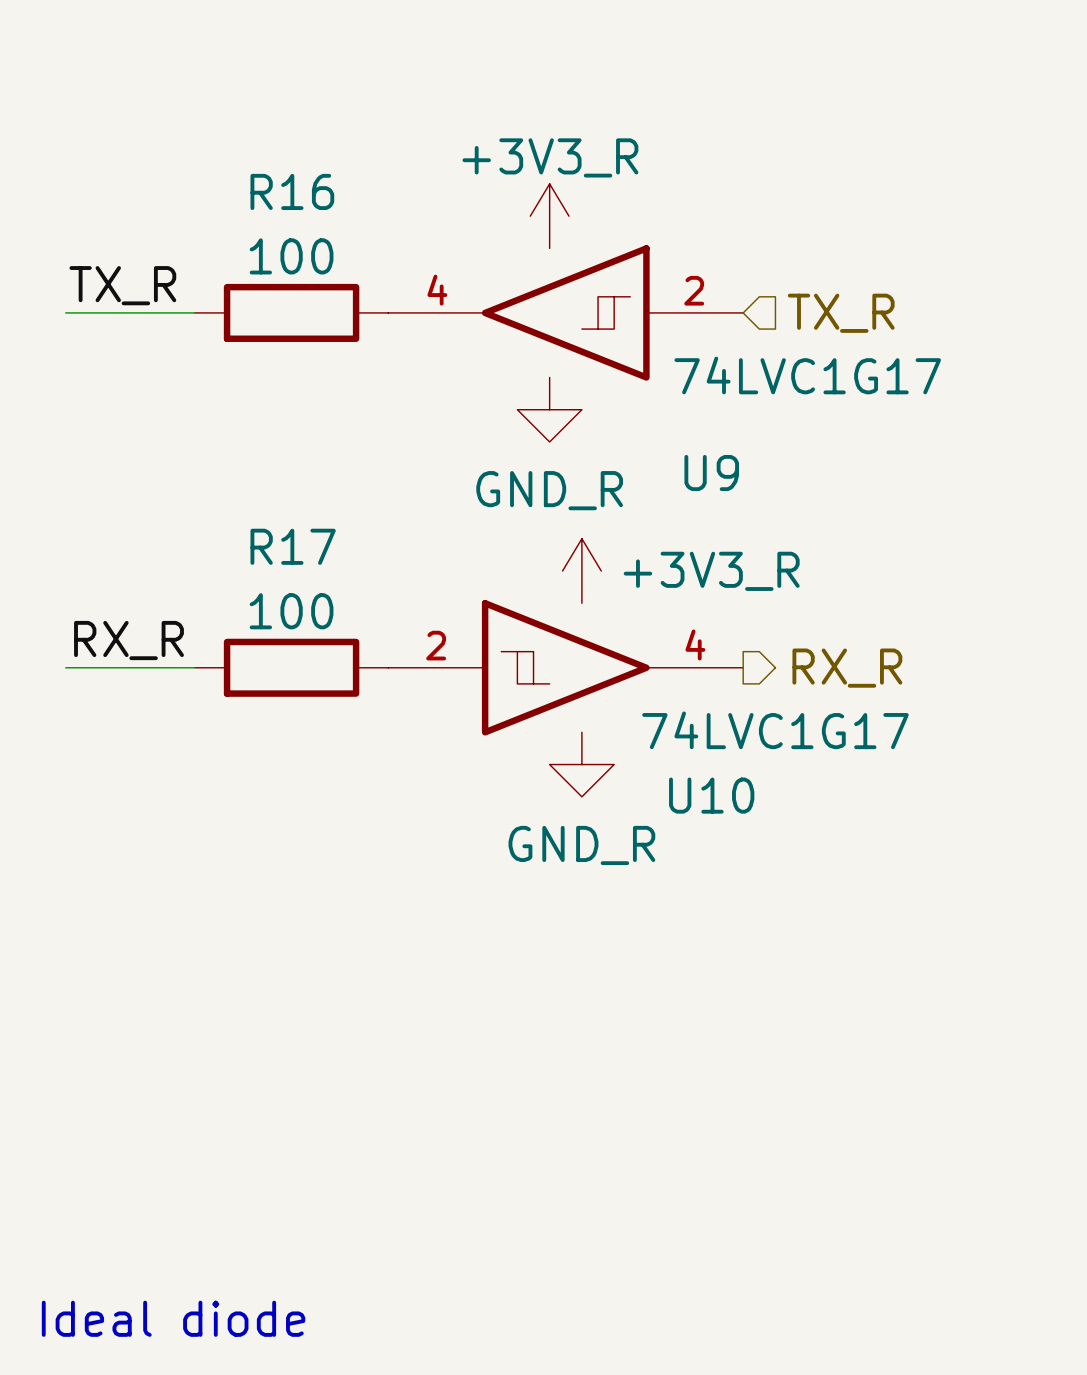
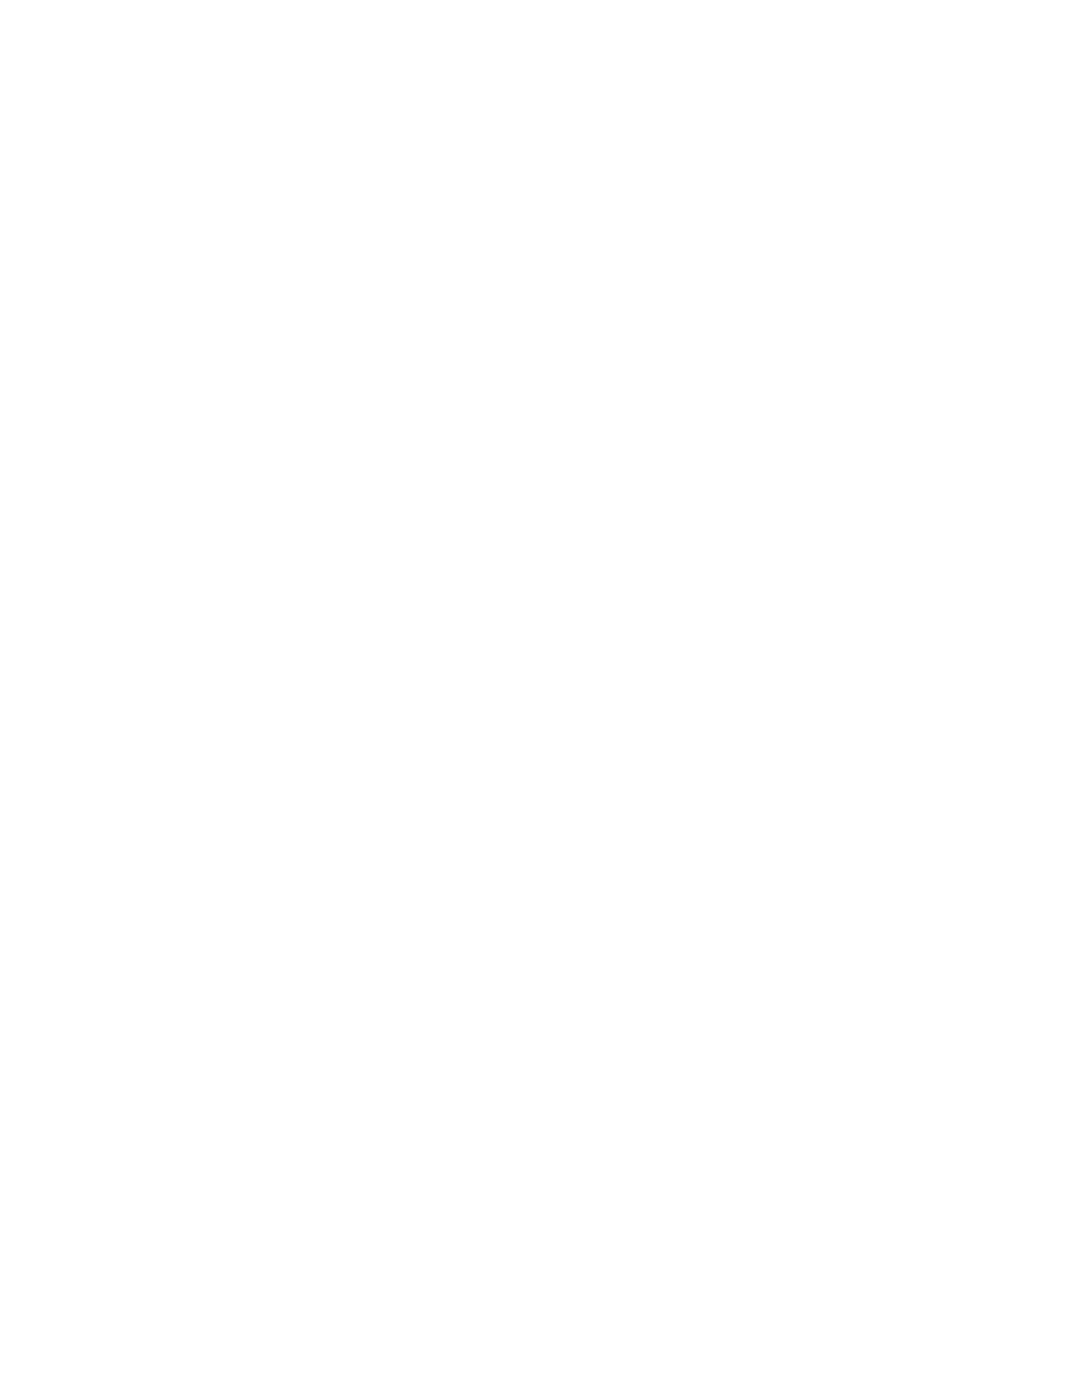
power symbol: +3V3_R (549, 216) -> none
label: TX_R (122, 285) -> none
wire: (65, 312) (194, 312) -> none
R16: 100 (291, 312) -> none
U9: 74LVC1G17 (565, 312) -> none
hierarchical label: TX_R (841, 313) -> none
power symbol: GND_R (549, 409) -> none
power symbol: +3V3_R (581, 571) -> none
label: RX_R (129, 640) -> none
wire: (65, 667) (194, 667) -> none
R17: 100 (291, 667) -> none
U10: 74LVC1G17 (565, 667) -> none
hierarchical label: RX_R (847, 668) -> none
power symbol: GND_R (581, 764) -> none
text: Ideal diode (173, 1318) -> none

